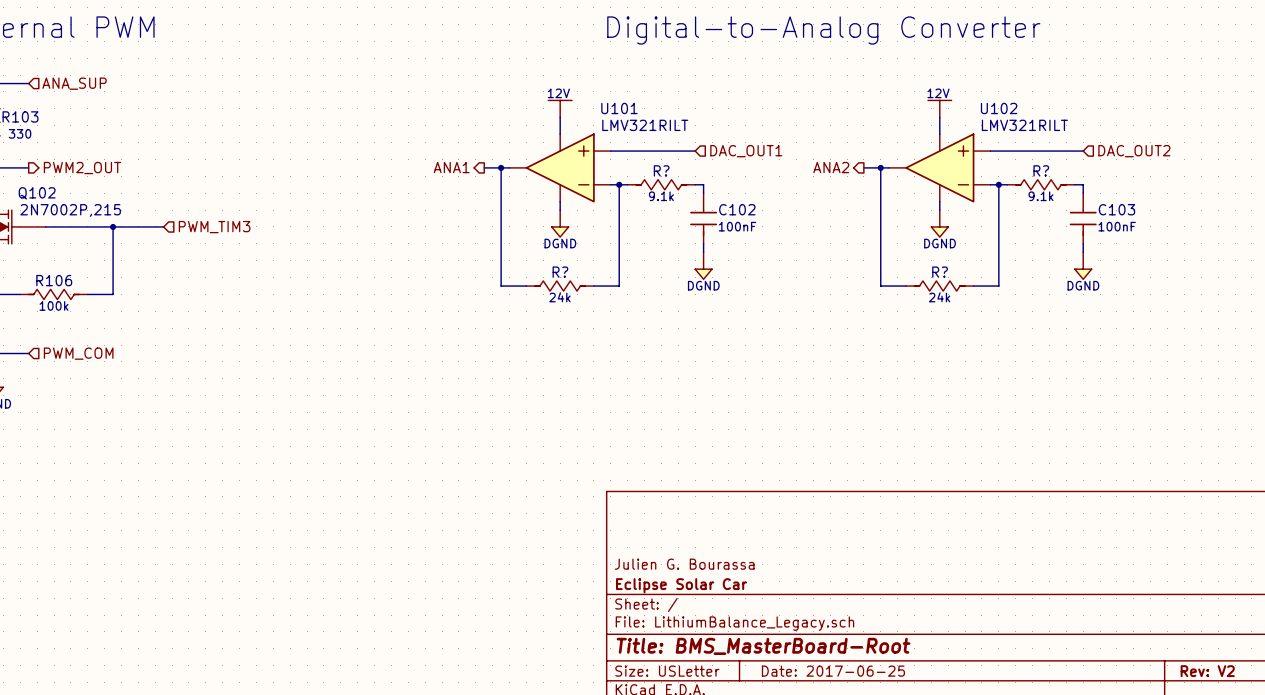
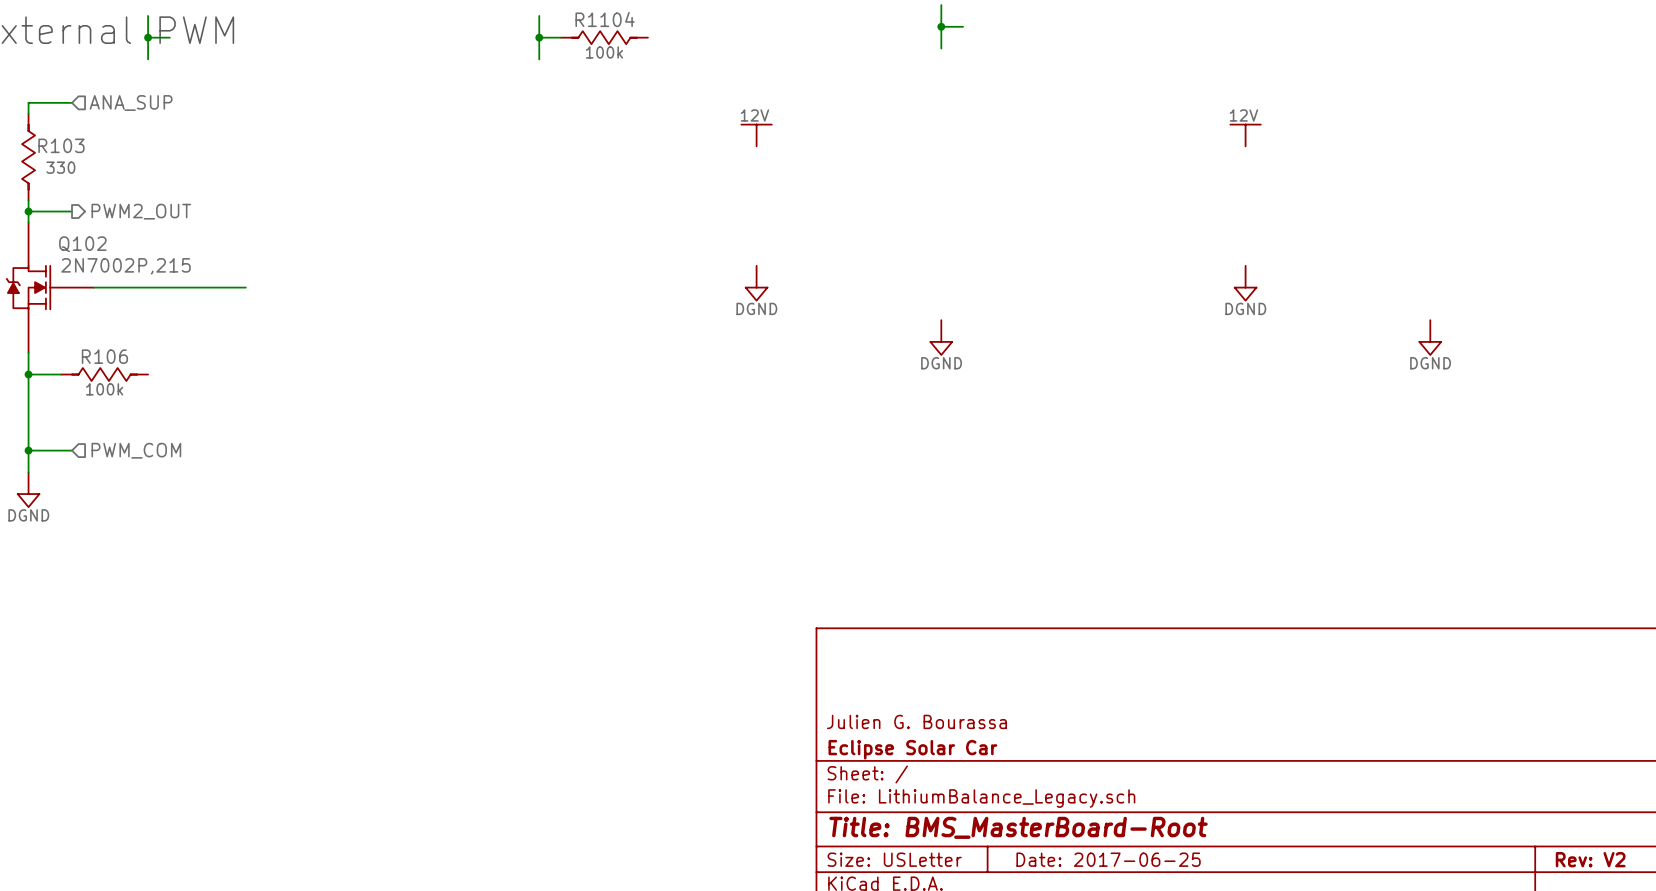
wire: none -> (941, 5) (941, 48)
wire: none -> (148, 15) (148, 59)
wire: none -> (539, 15) (539, 59)
wire: none -> (941, 26) (963, 26)
junction: none -> (941, 26)
text: Digital-to-Analog Converter (823, 30) -> none
wire: none -> (148, 37) (169, 37)
junction: none -> (148, 37)
wire: none -> (539, 37) (560, 37)
junction: none -> (539, 37)
R1104: none -> (604, 37)
wire: (560, 117) (560, 134) -> none
wire: (939, 117) (939, 134) -> none
wire: (610, 151) (695, 151) -> none
hierarchical label: DAC_OUT1 (746, 151) -> none
wire: (990, 151) (1083, 151) -> none
hierarchical label: DAC_OUT2 (1134, 151) -> none
hierarchical label: ANA1 (451, 167) -> none
wire: (484, 167) (509, 167) -> none
wire: (501, 167) (501, 286) (526, 286) -> none
junction: (501, 167) -> none
U101: LMV321RILT (560, 167) -> none
hierarchical label: ANA2 (831, 167) -> none
wire: (863, 167) (889, 167) -> none
wire: (880, 167) (880, 286) (906, 286) -> none
junction: (880, 167) -> none
U102: LMV321RILT (939, 167) -> none
wire: (610, 184) (627, 184) -> none
wire: (619, 184) (619, 286) (593, 286) -> none
junction: (619, 184) -> none
R?: (661, 184) -> none
wire: (695, 184) (703, 184) (703, 193) -> none
wire: (990, 184) (1007, 184) -> none
wire: (998, 184) (998, 286) (973, 286) -> none
junction: (998, 184) -> none
R?: (1041, 184) -> none
wire: (1074, 184) (1083, 184) (1083, 193) -> none
wire: (560, 201) (560, 210) -> none
wire: (939, 201) (939, 210) -> none
C102: (703, 218) -> none
C103: (1083, 218) -> none
wire: (113, 226) (113, 294) (87, 294) -> none
junction: (113, 226) -> none
hierarchical label: PWM_TIM3 (214, 227) -> none
wire: (703, 243) (703, 252) -> none
wire: (1083, 243) (1083, 252) -> none
R?: (560, 286) -> none
R?: (939, 286) -> none

